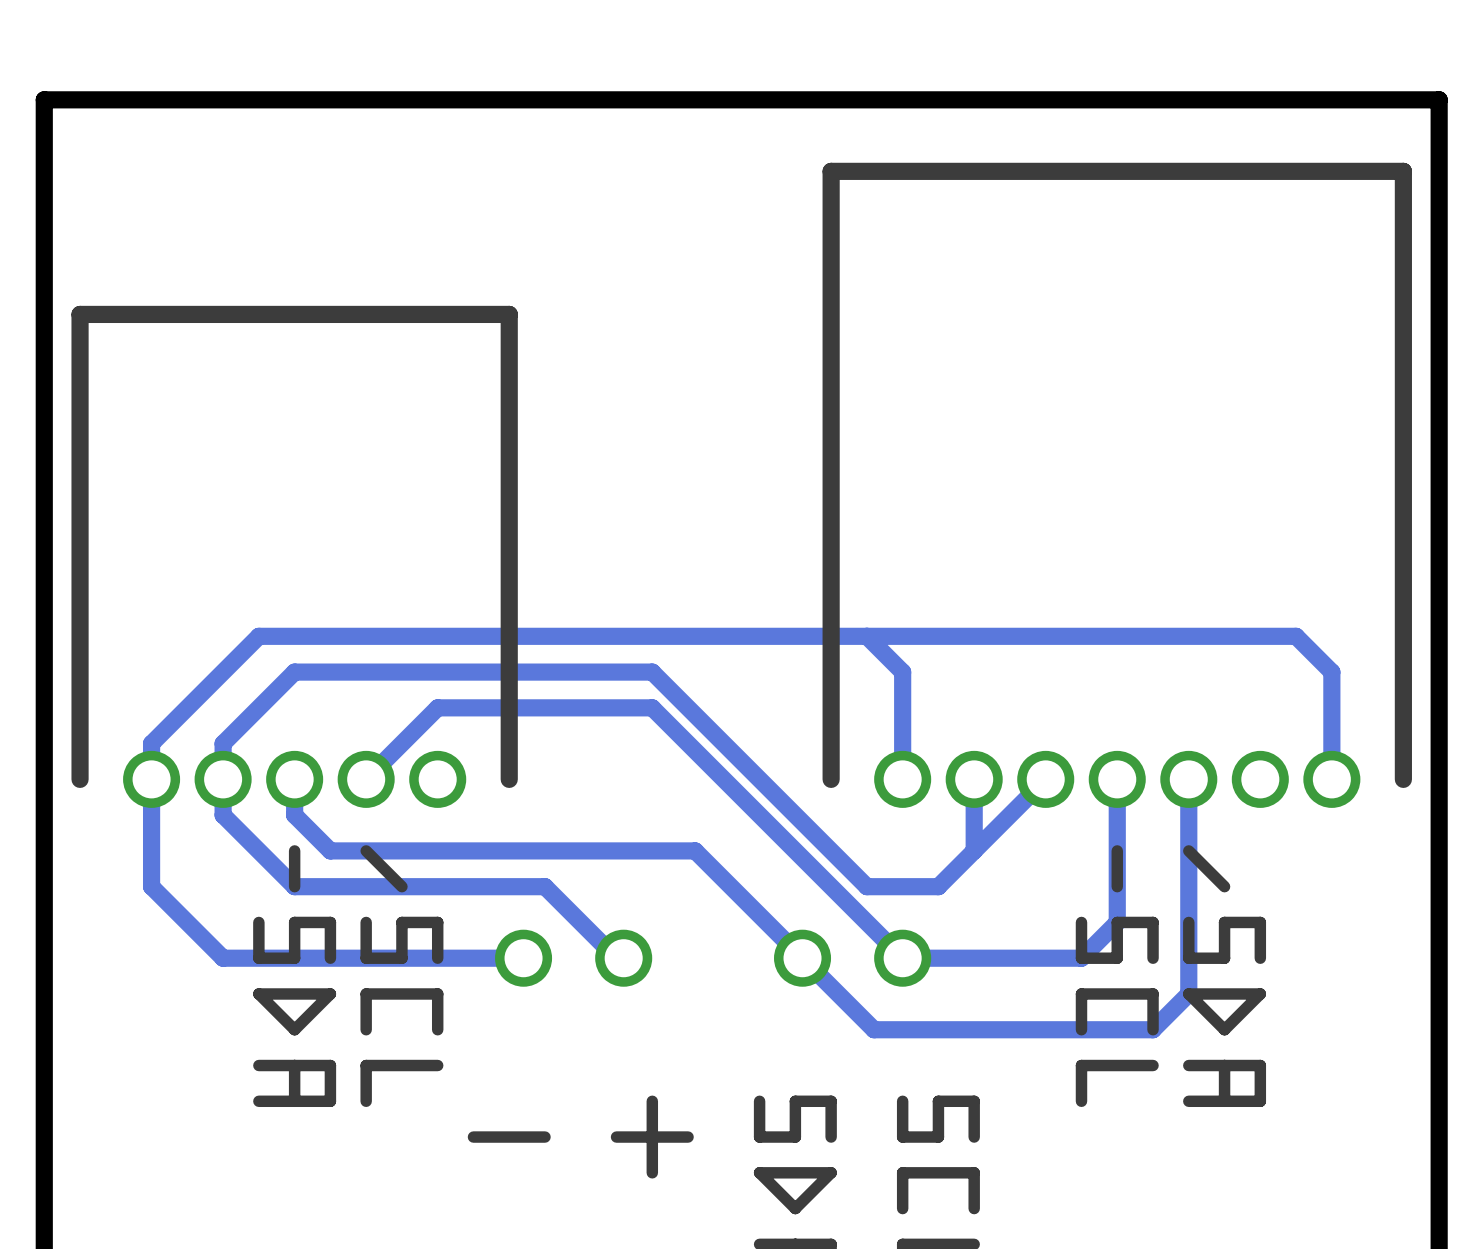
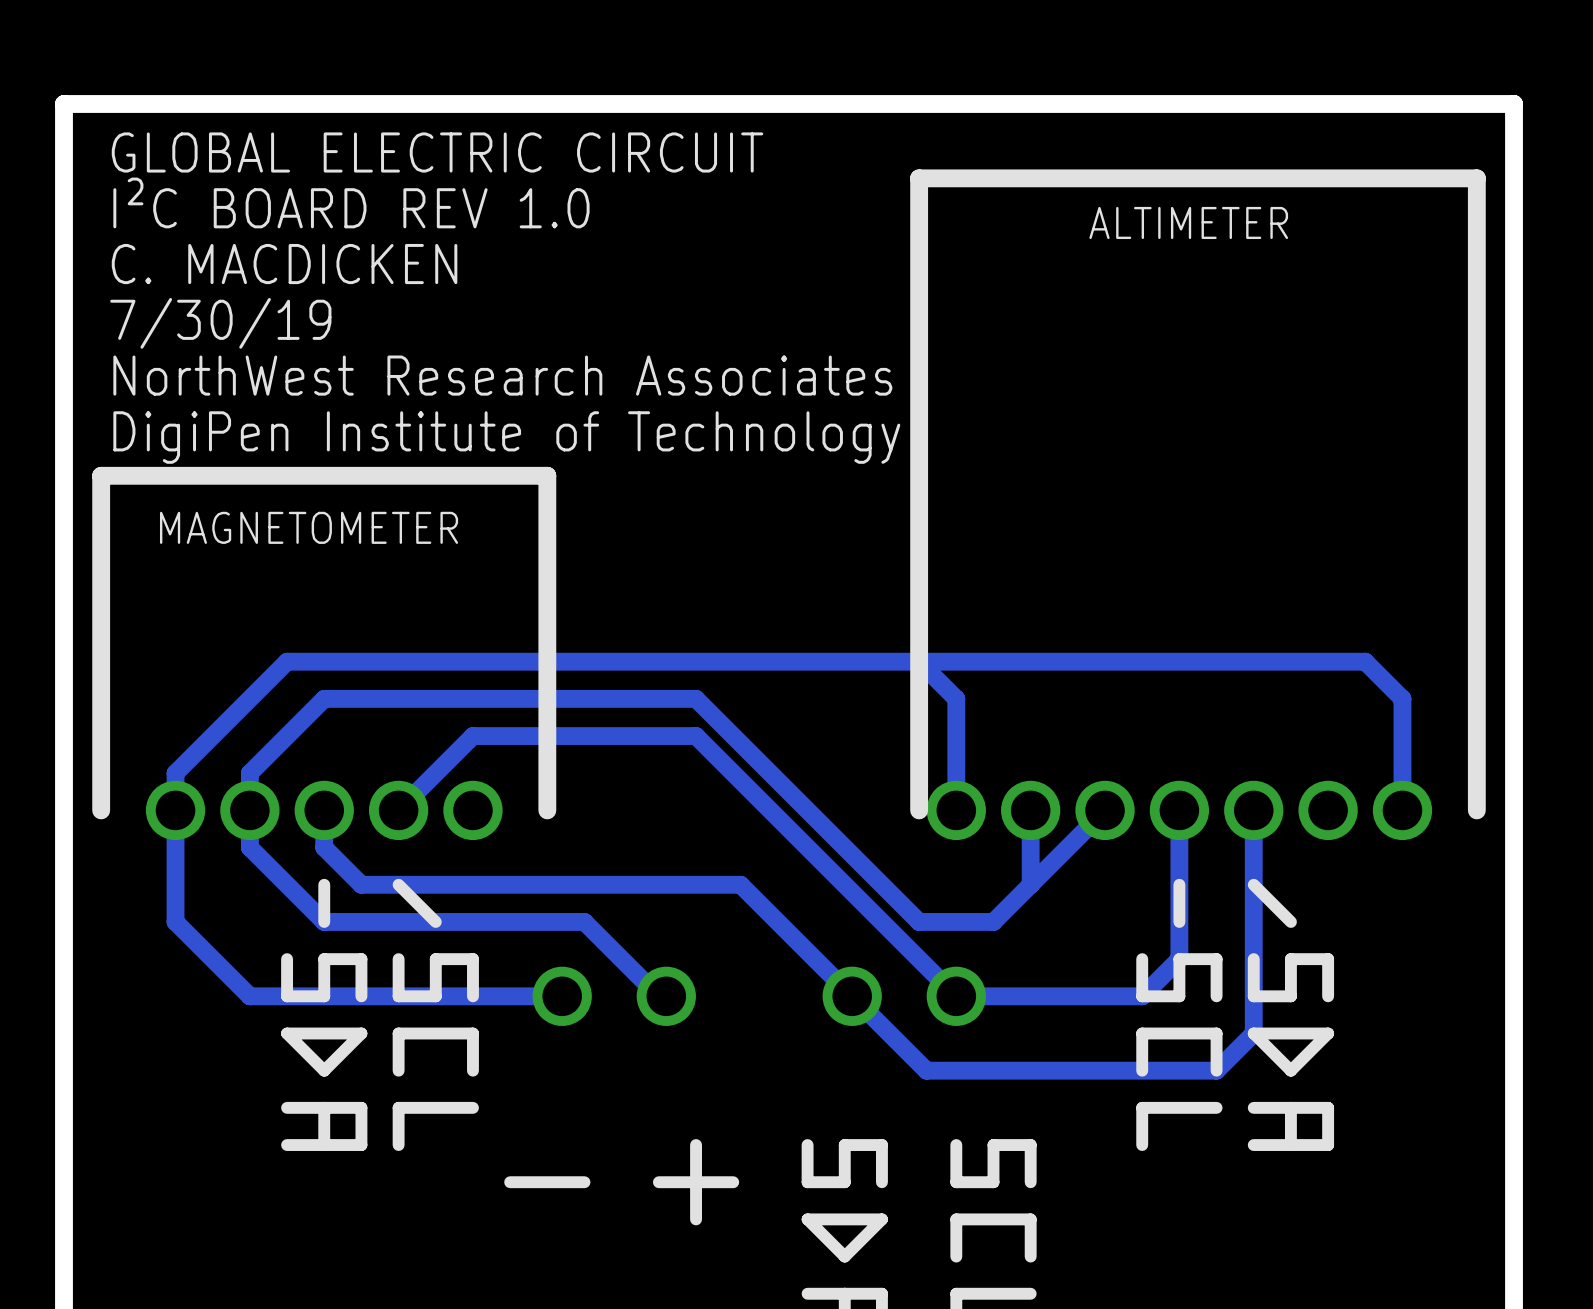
text: none -> GLOBAL ELECTRIC CIRCUIT (437, 152)
line: (866, 171) (831, 171) (831, 779) -> (919, 178) (919, 810)
text: none -> I²C BOARD REV 1.0 (351, 202)
text: none -> ALTIMETER (1188, 222)
text: none -> C. MACDICKEN (284, 264)
text: none -> 7/30/19 (220, 323)
text: none -> NorthWest Research Associates (502, 375)
text: none -> DigiPen Institute of Technology (506, 437)
line: (80, 457) (80, 314) (509, 314) (509, 457) -> (101, 475) (547, 475)
text: none -> MAGNETOMETER (309, 527)

